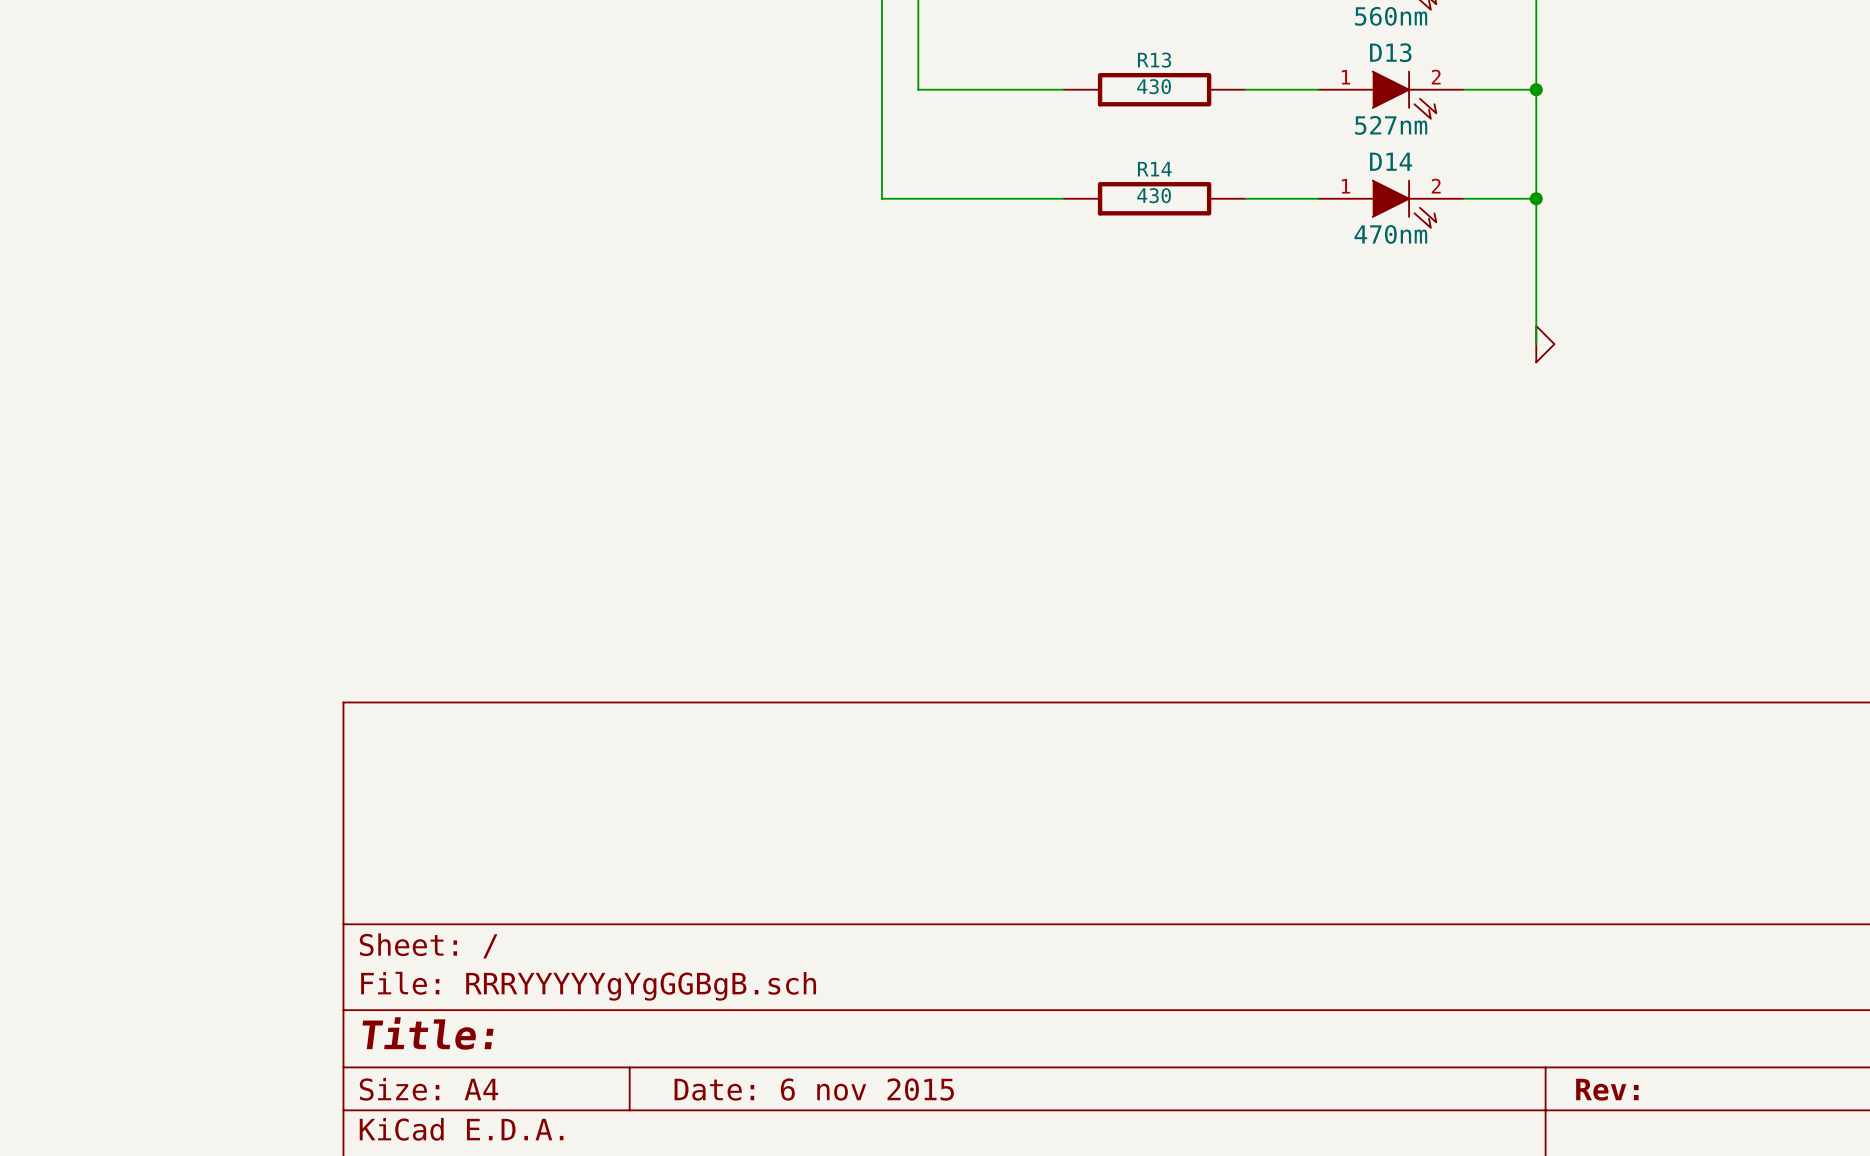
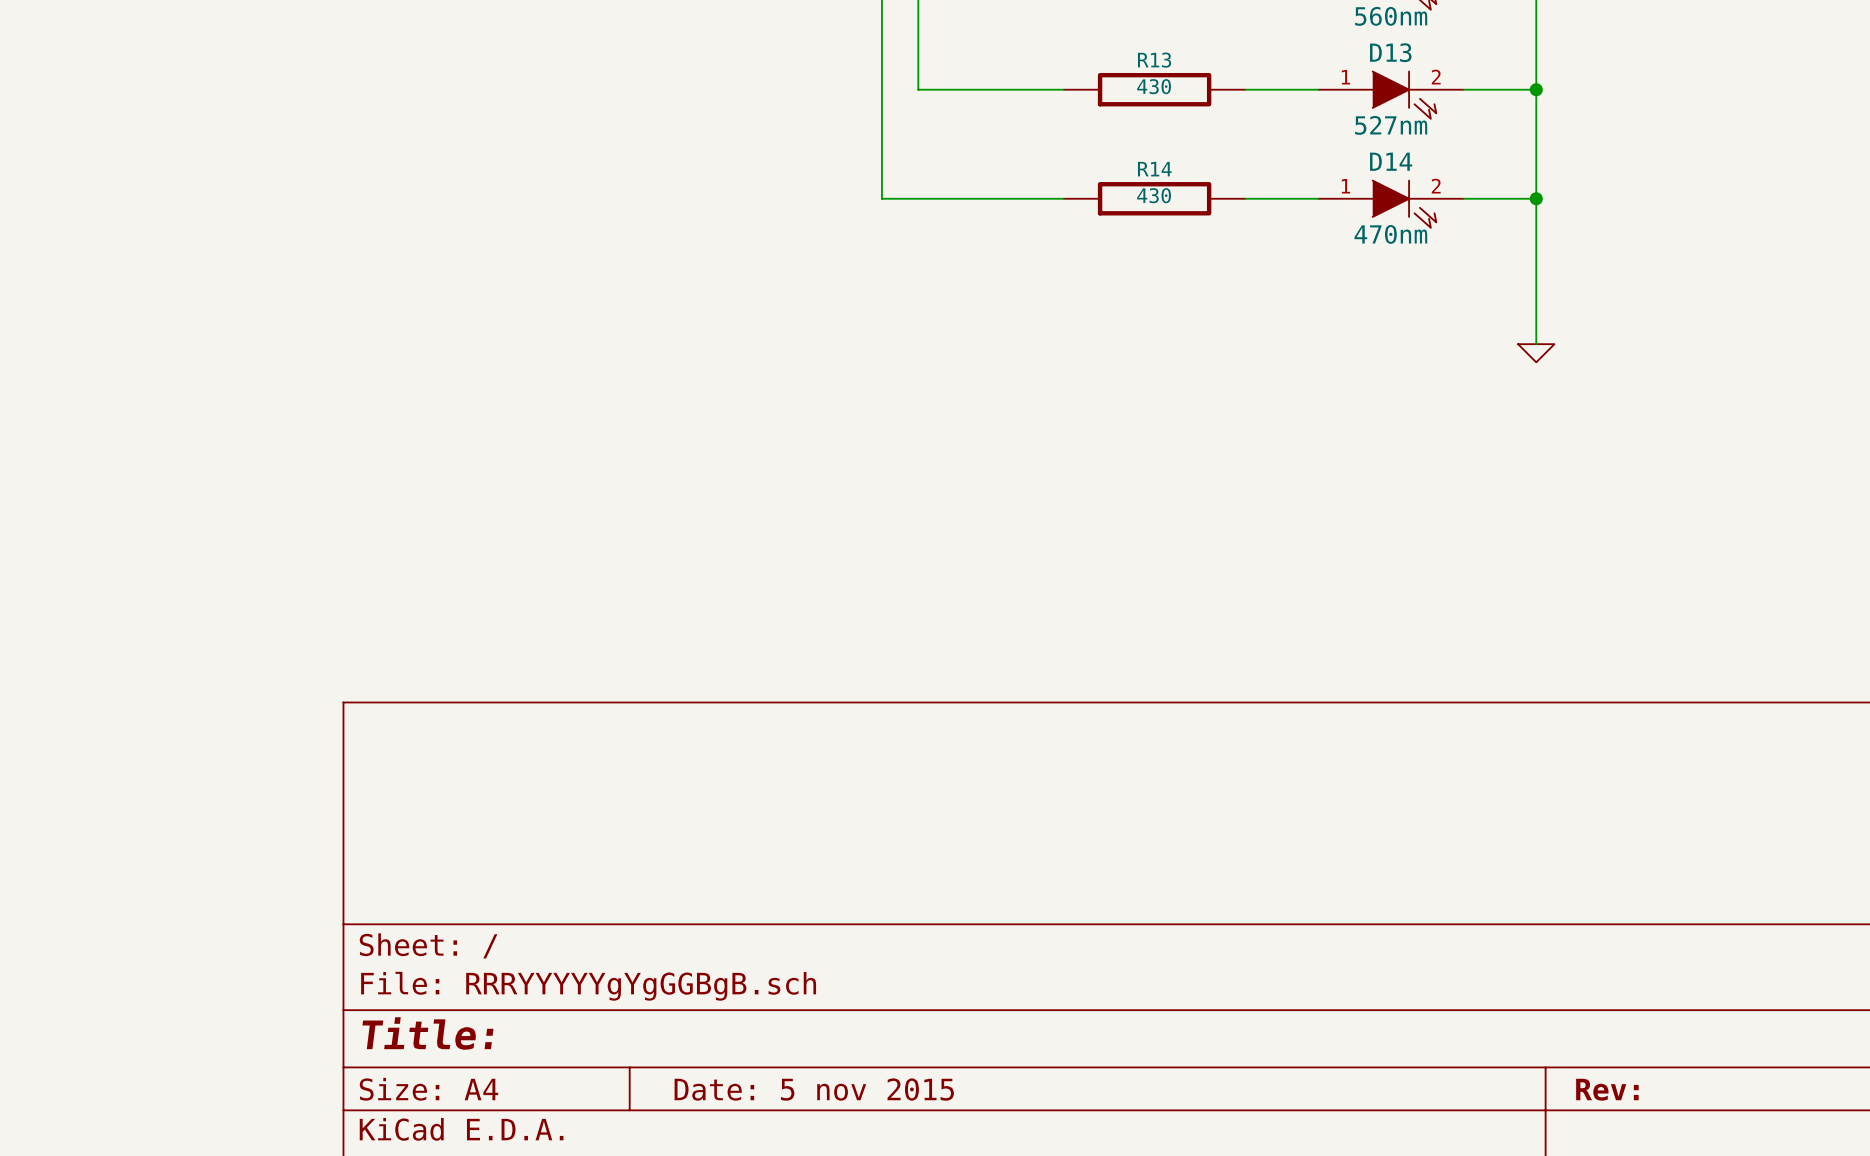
power symbol rotation: 0° (1545, 344) -> 90° clockwise (1536, 353)
title block: Date: 6 nov 2015 (814, 1089) -> Date: 5 nov 2015 (814, 1089)

